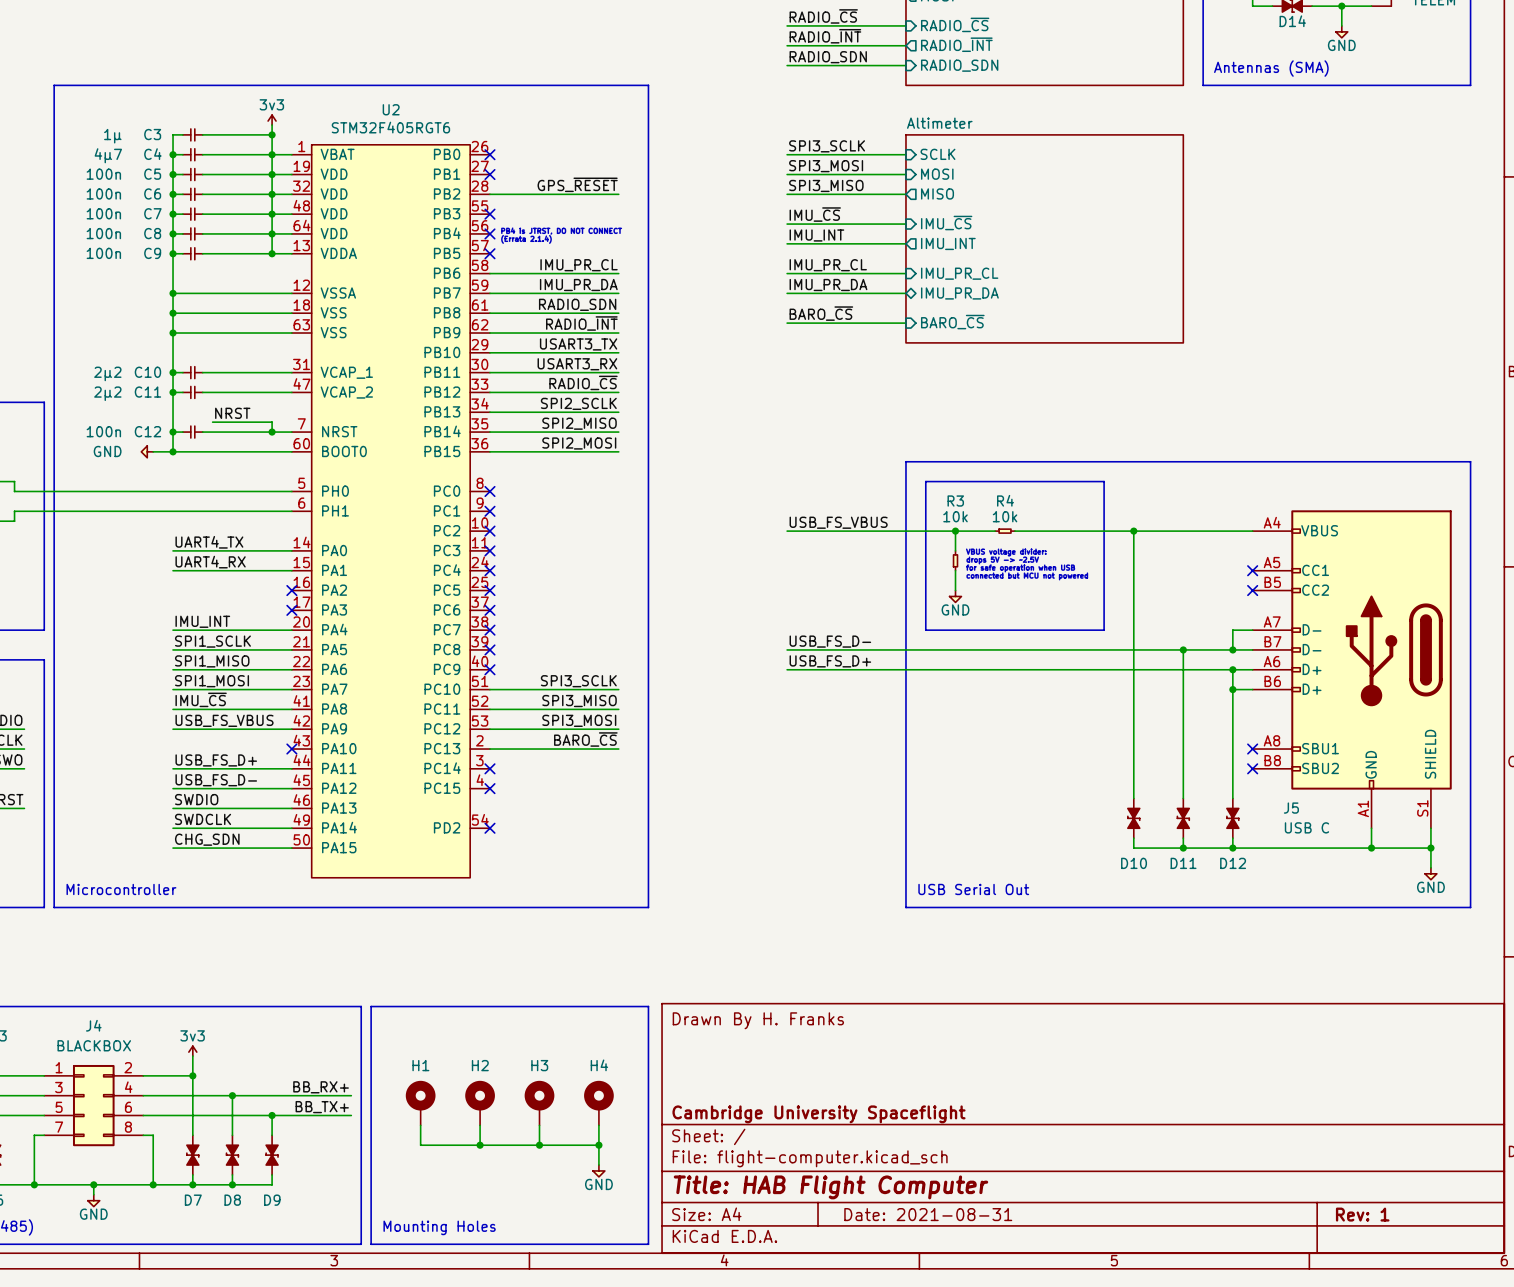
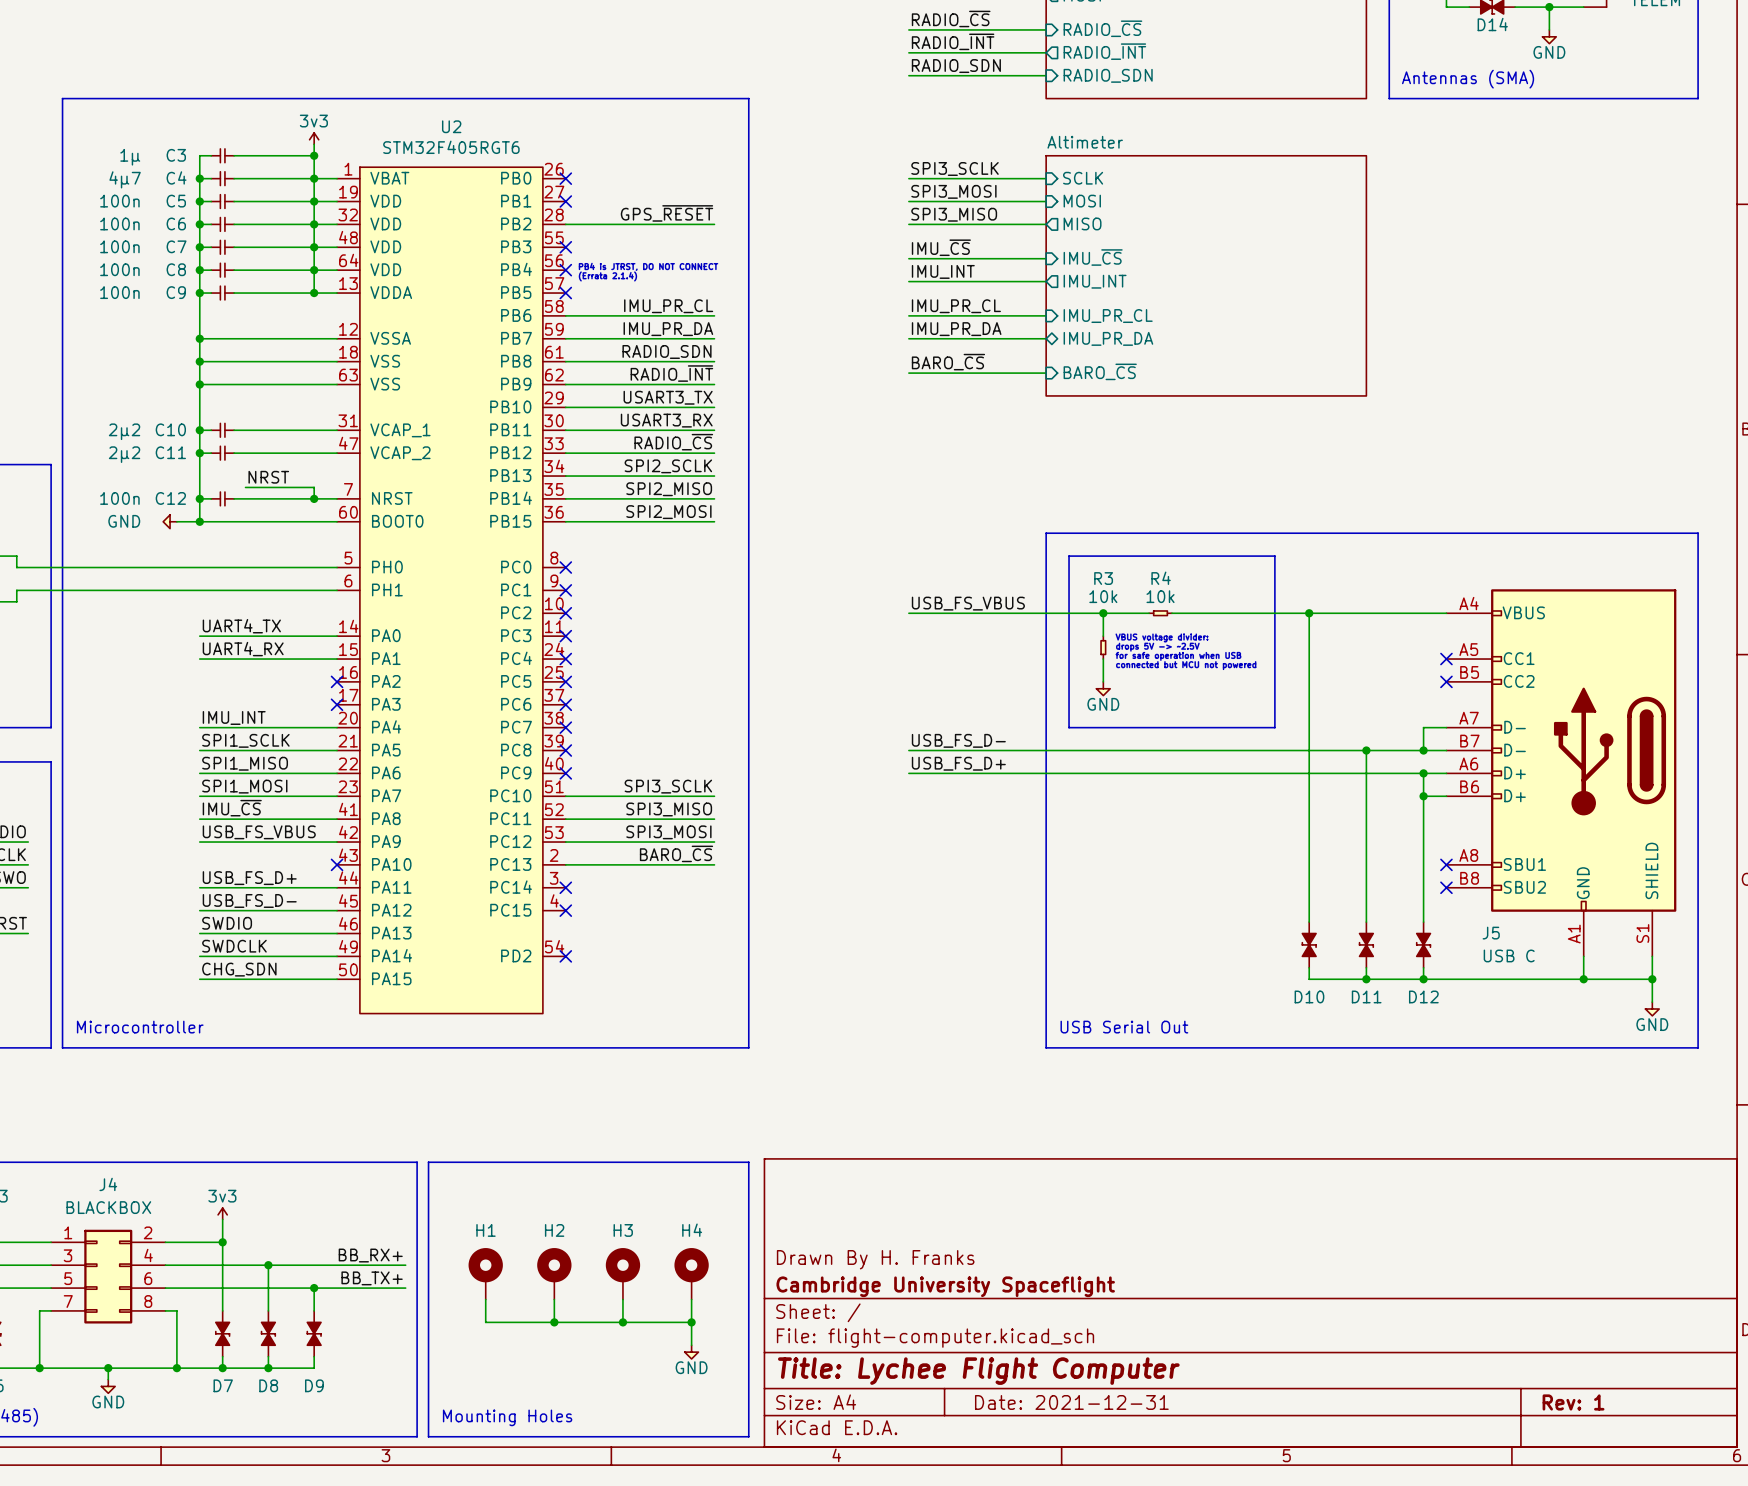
title block position: Drawn By H. Franks (758, 1020) -> Drawn By H. Franks (875, 1259)
title block: Title: HAB Flight Computer (830, 1187) -> Title: Lychee Flight Computer (978, 1371)
title block: Date: 2021-08-31 (928, 1214) -> Date: 2021-12-31 (1071, 1402)

